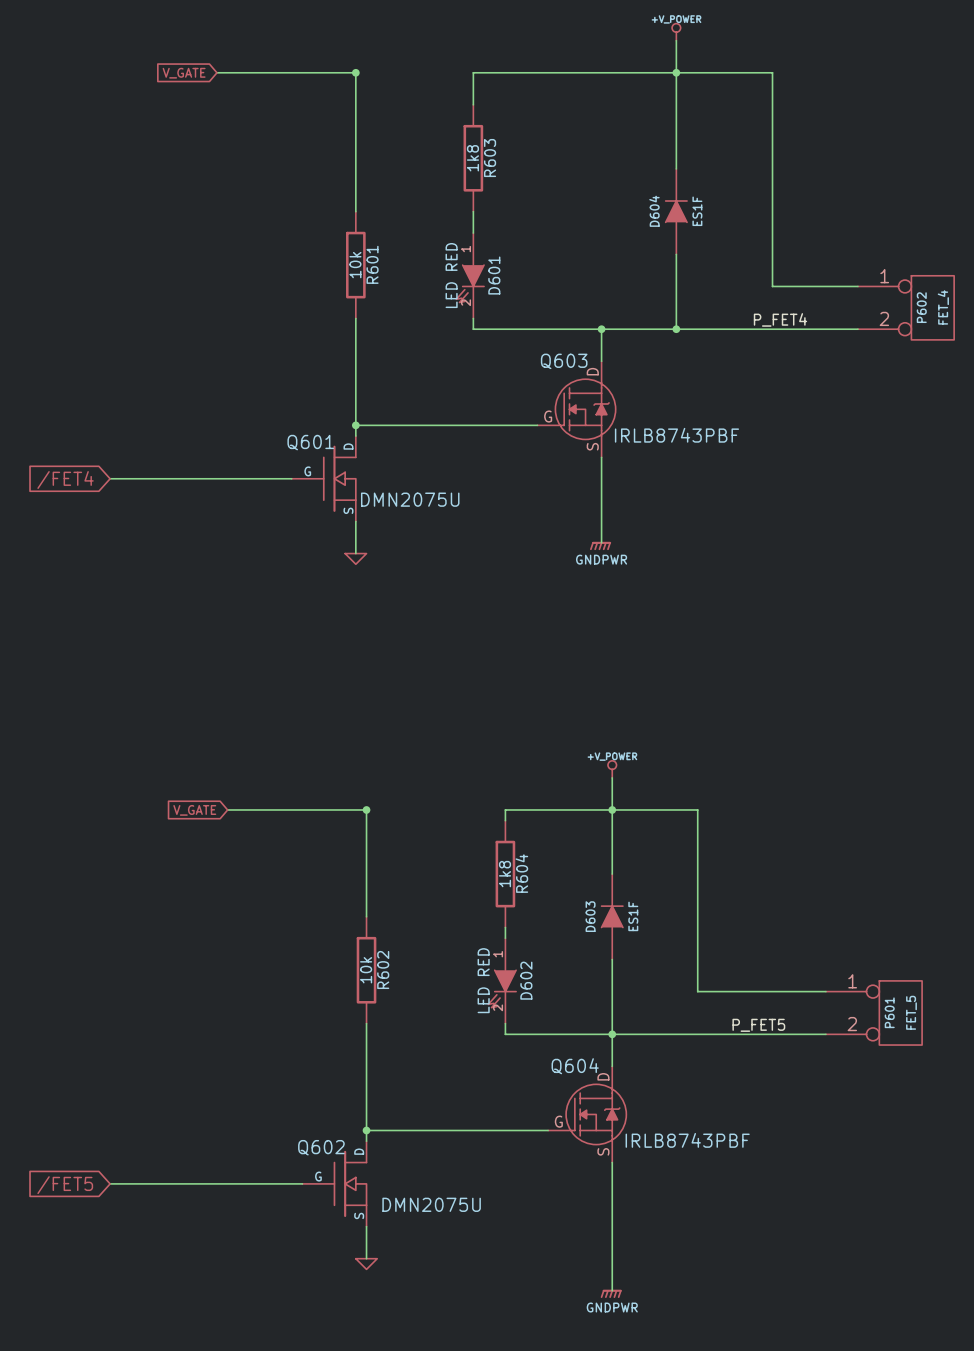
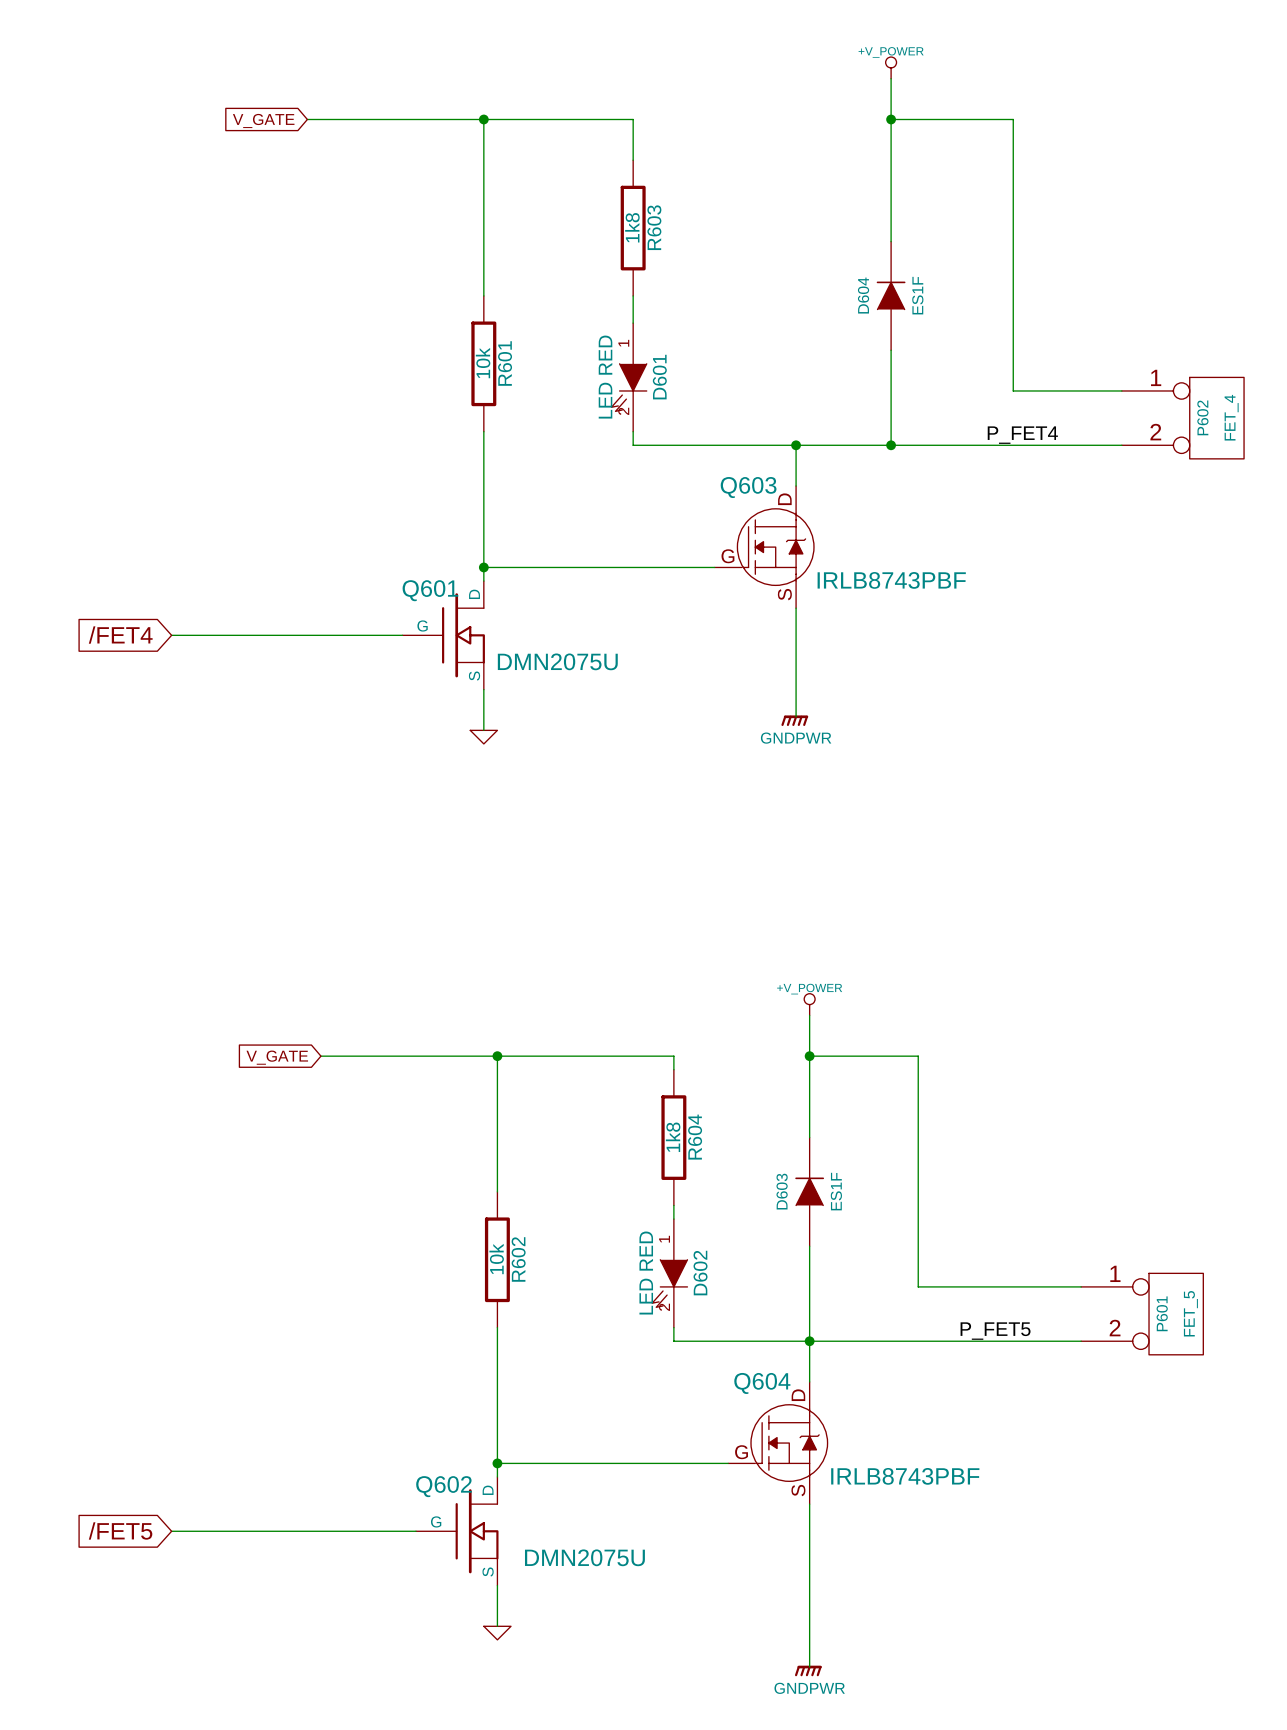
wire: (473, 72) (676, 72) -> (633, 119) (483, 119)
wire: (505, 809) (612, 809) -> (673, 1056) (497, 1056)

